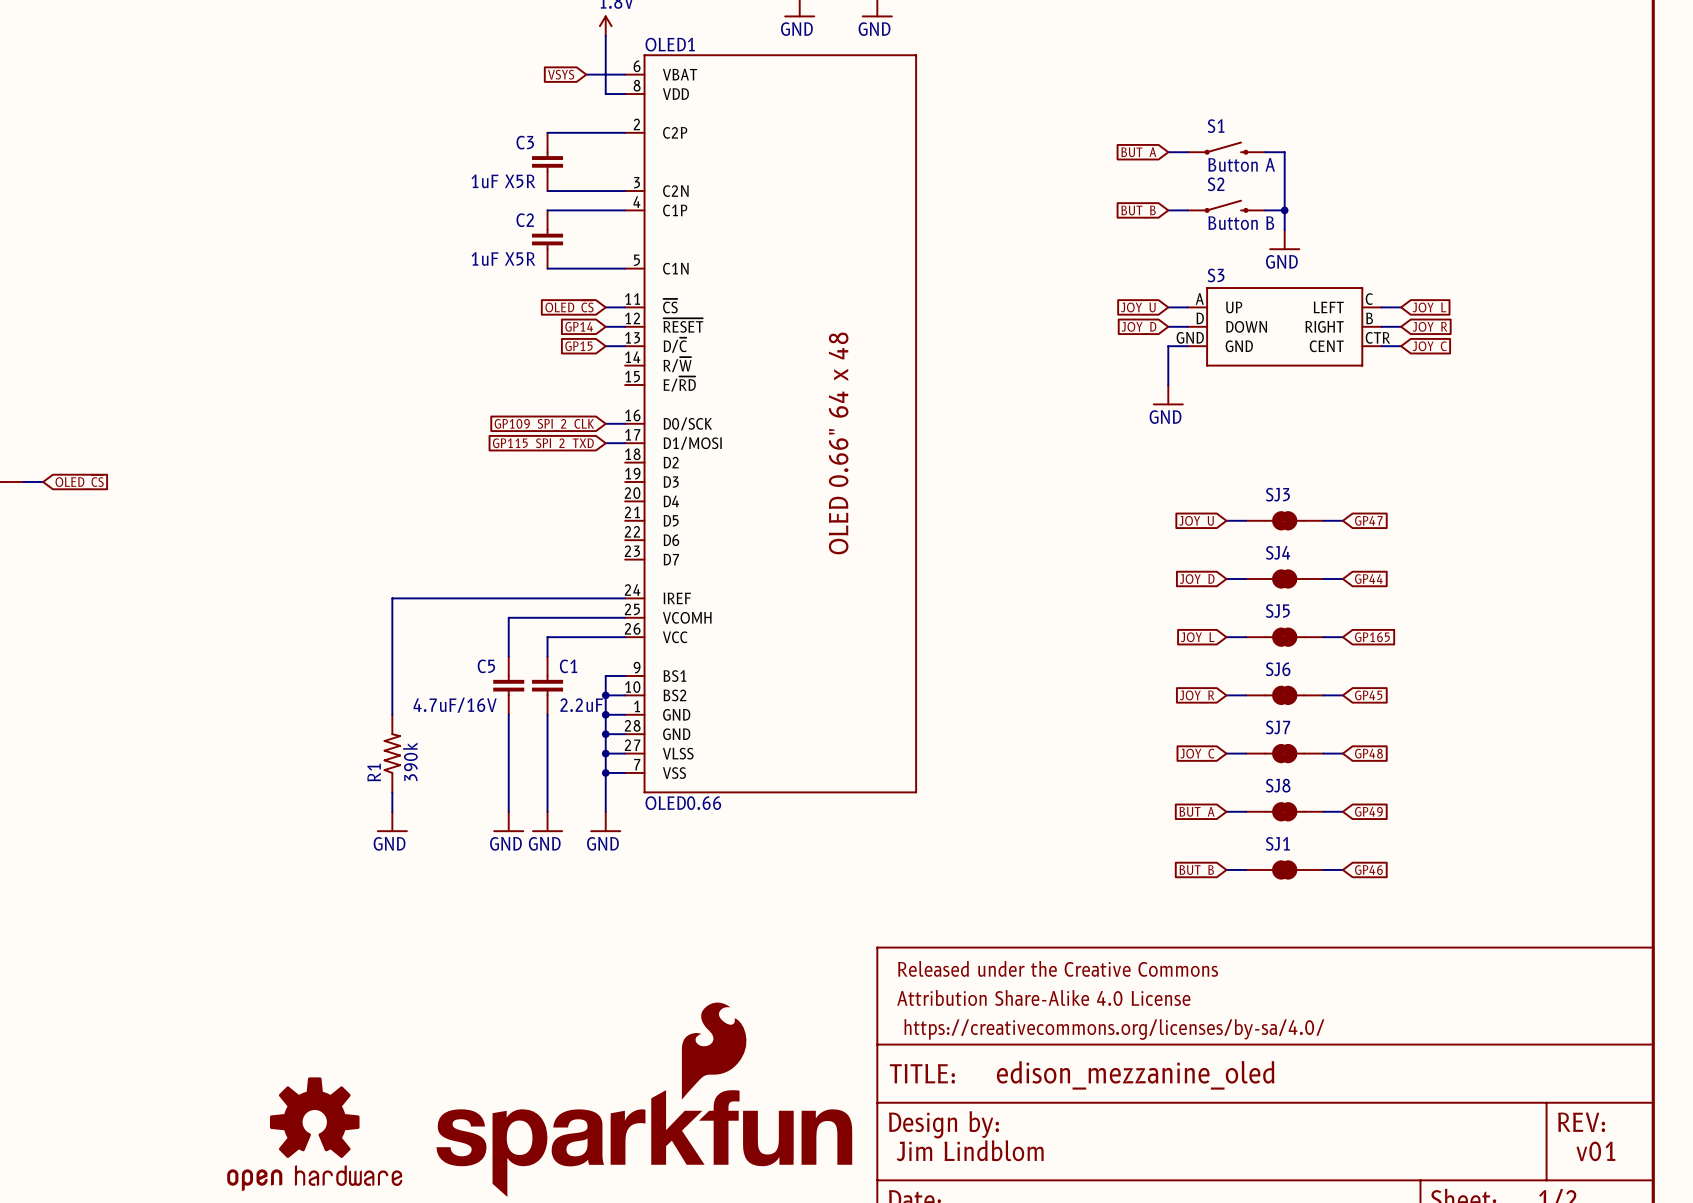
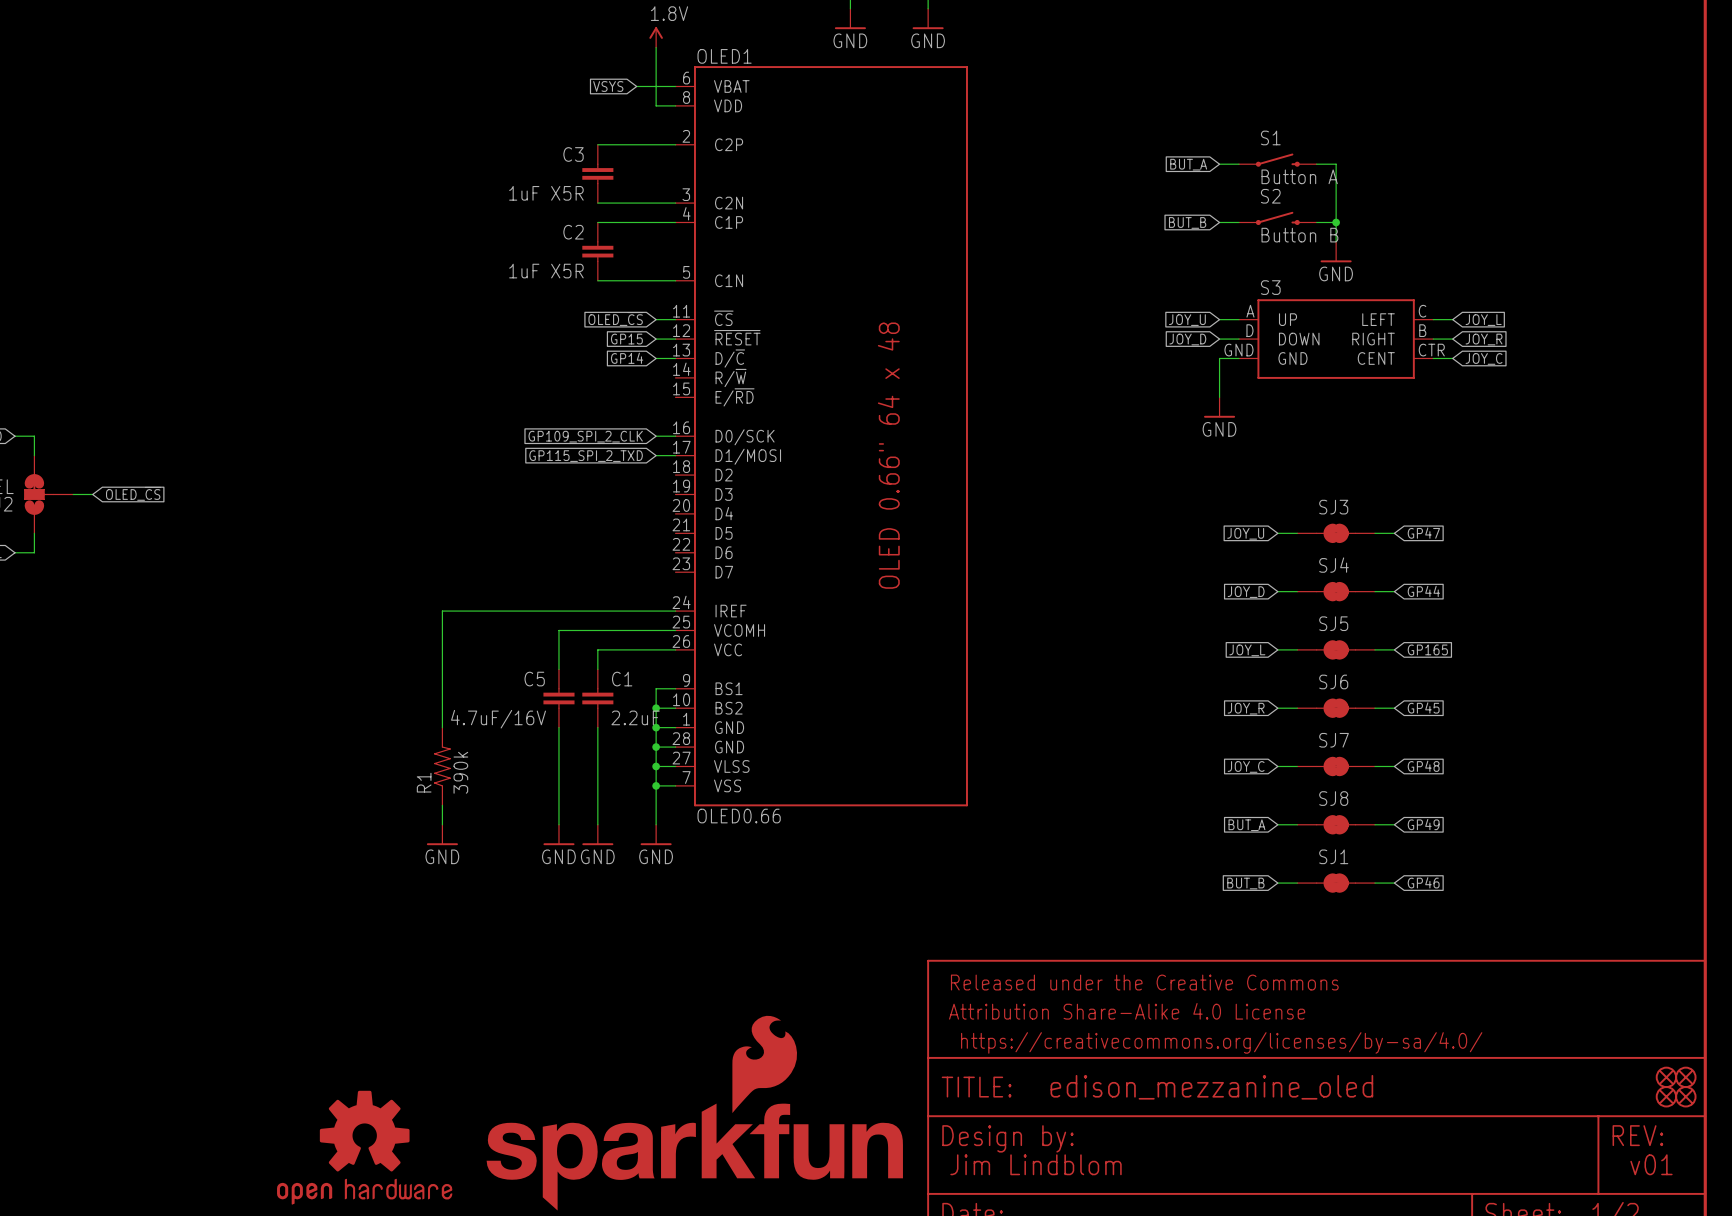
global label: GP14 (579, 326) -> GP15 (626, 339)
global label: GP15 (578, 346) -> GP14 (627, 358)
part: none -> (1666, 1077)
part: none -> (1685, 1077)
part: none -> (1666, 1096)
part: none -> (1685, 1096)

